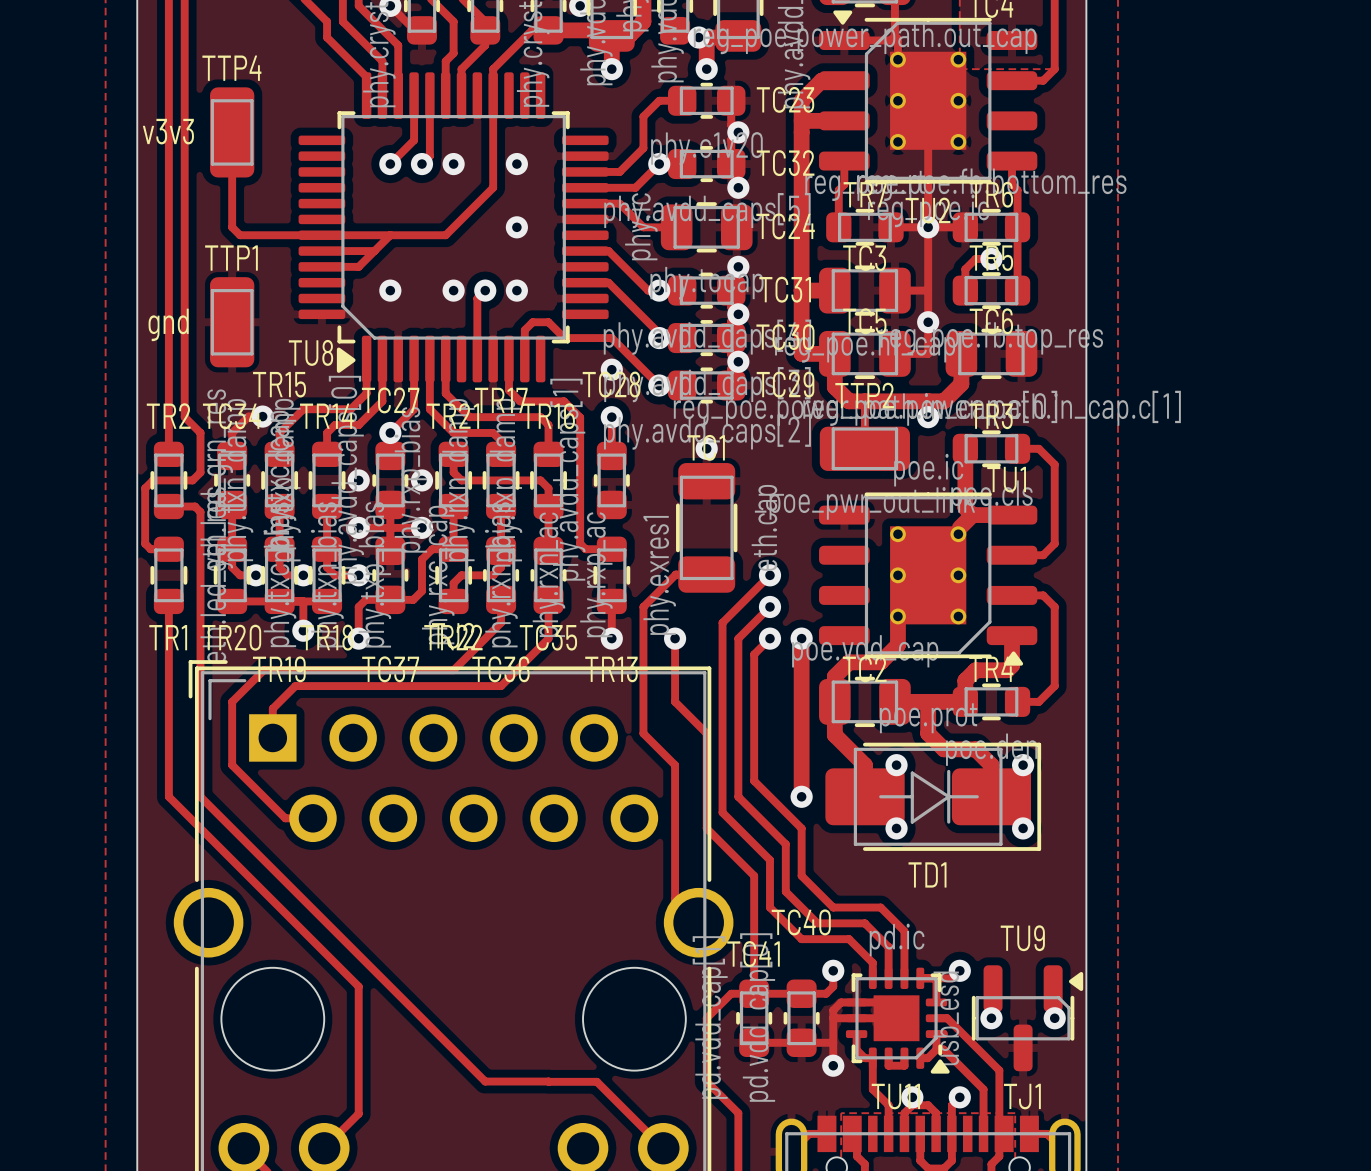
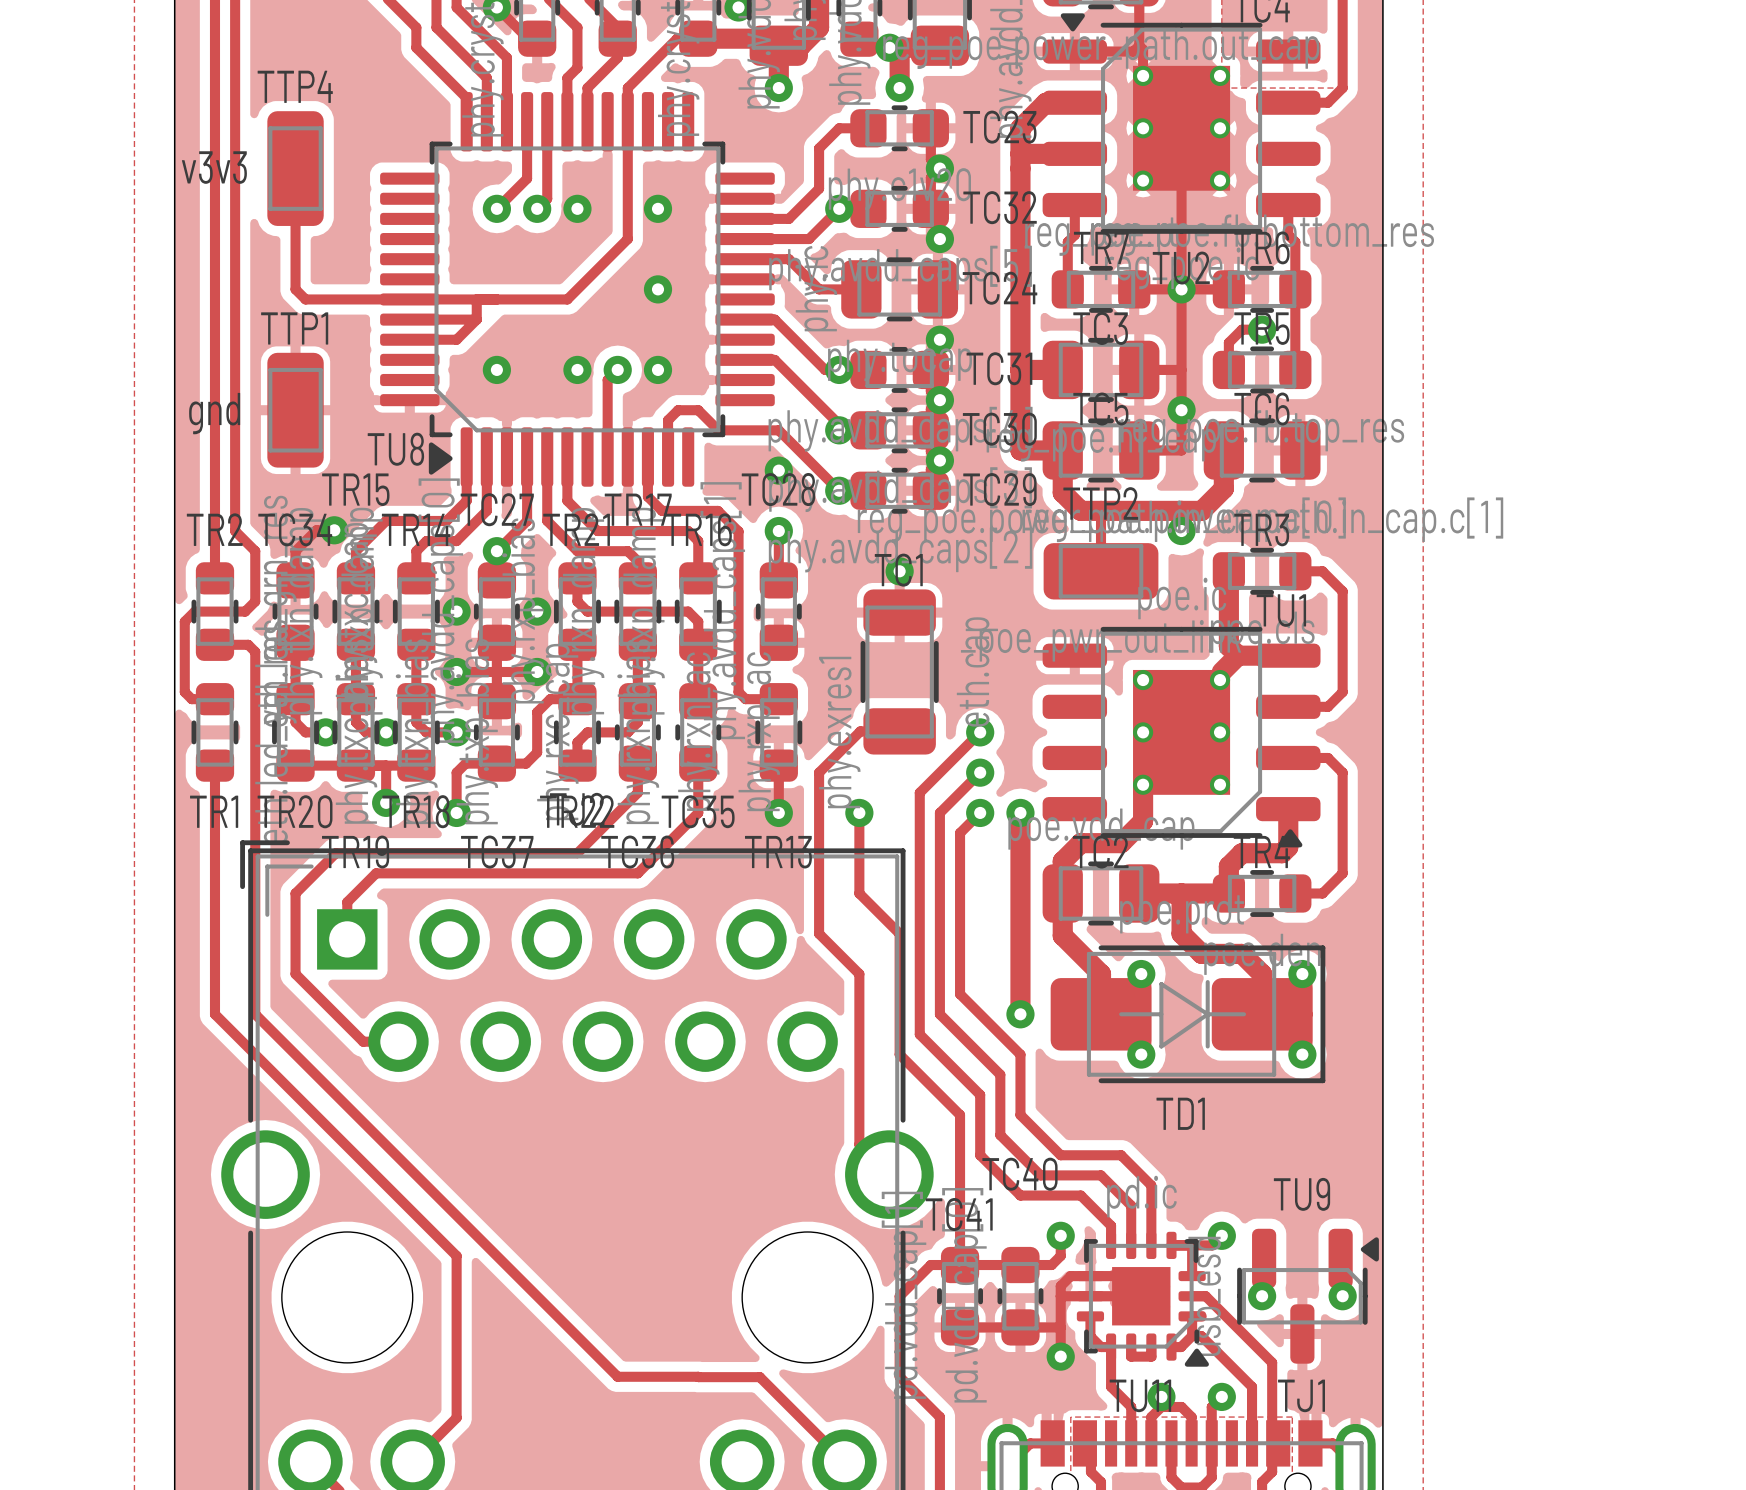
track: (390, 235) (374, 251) -> (476, 299) (476, 319)

